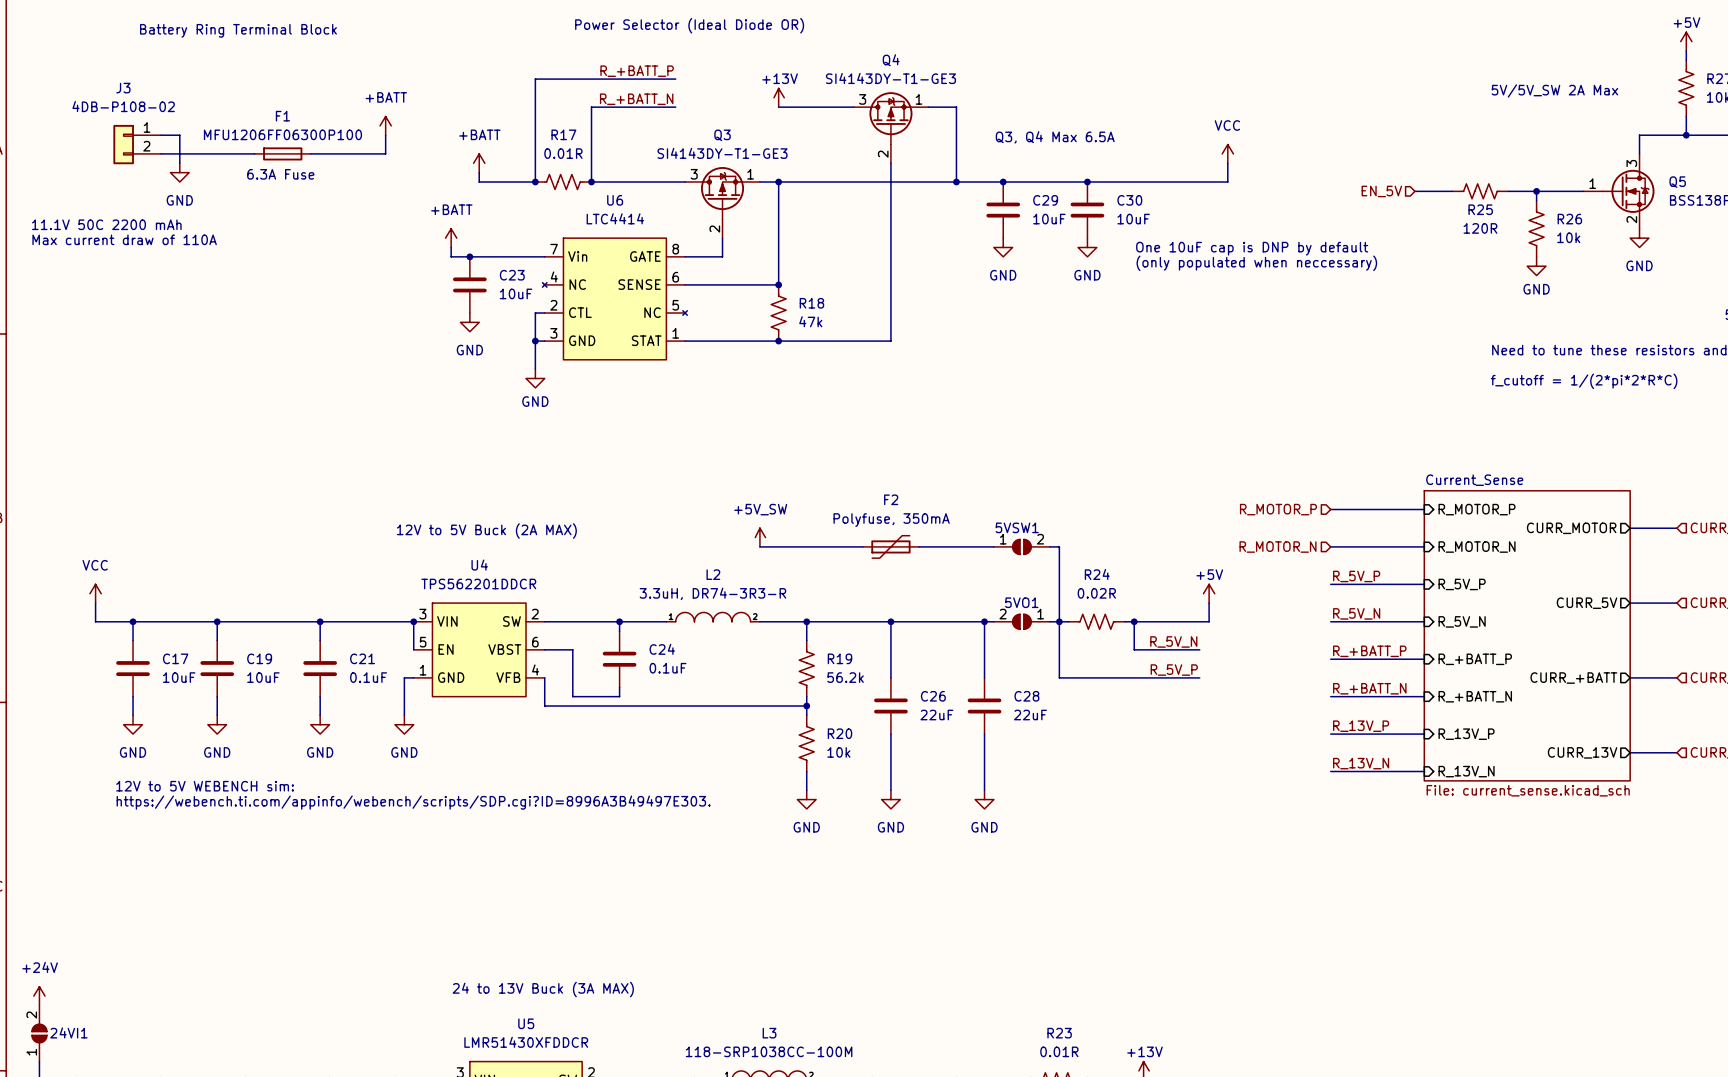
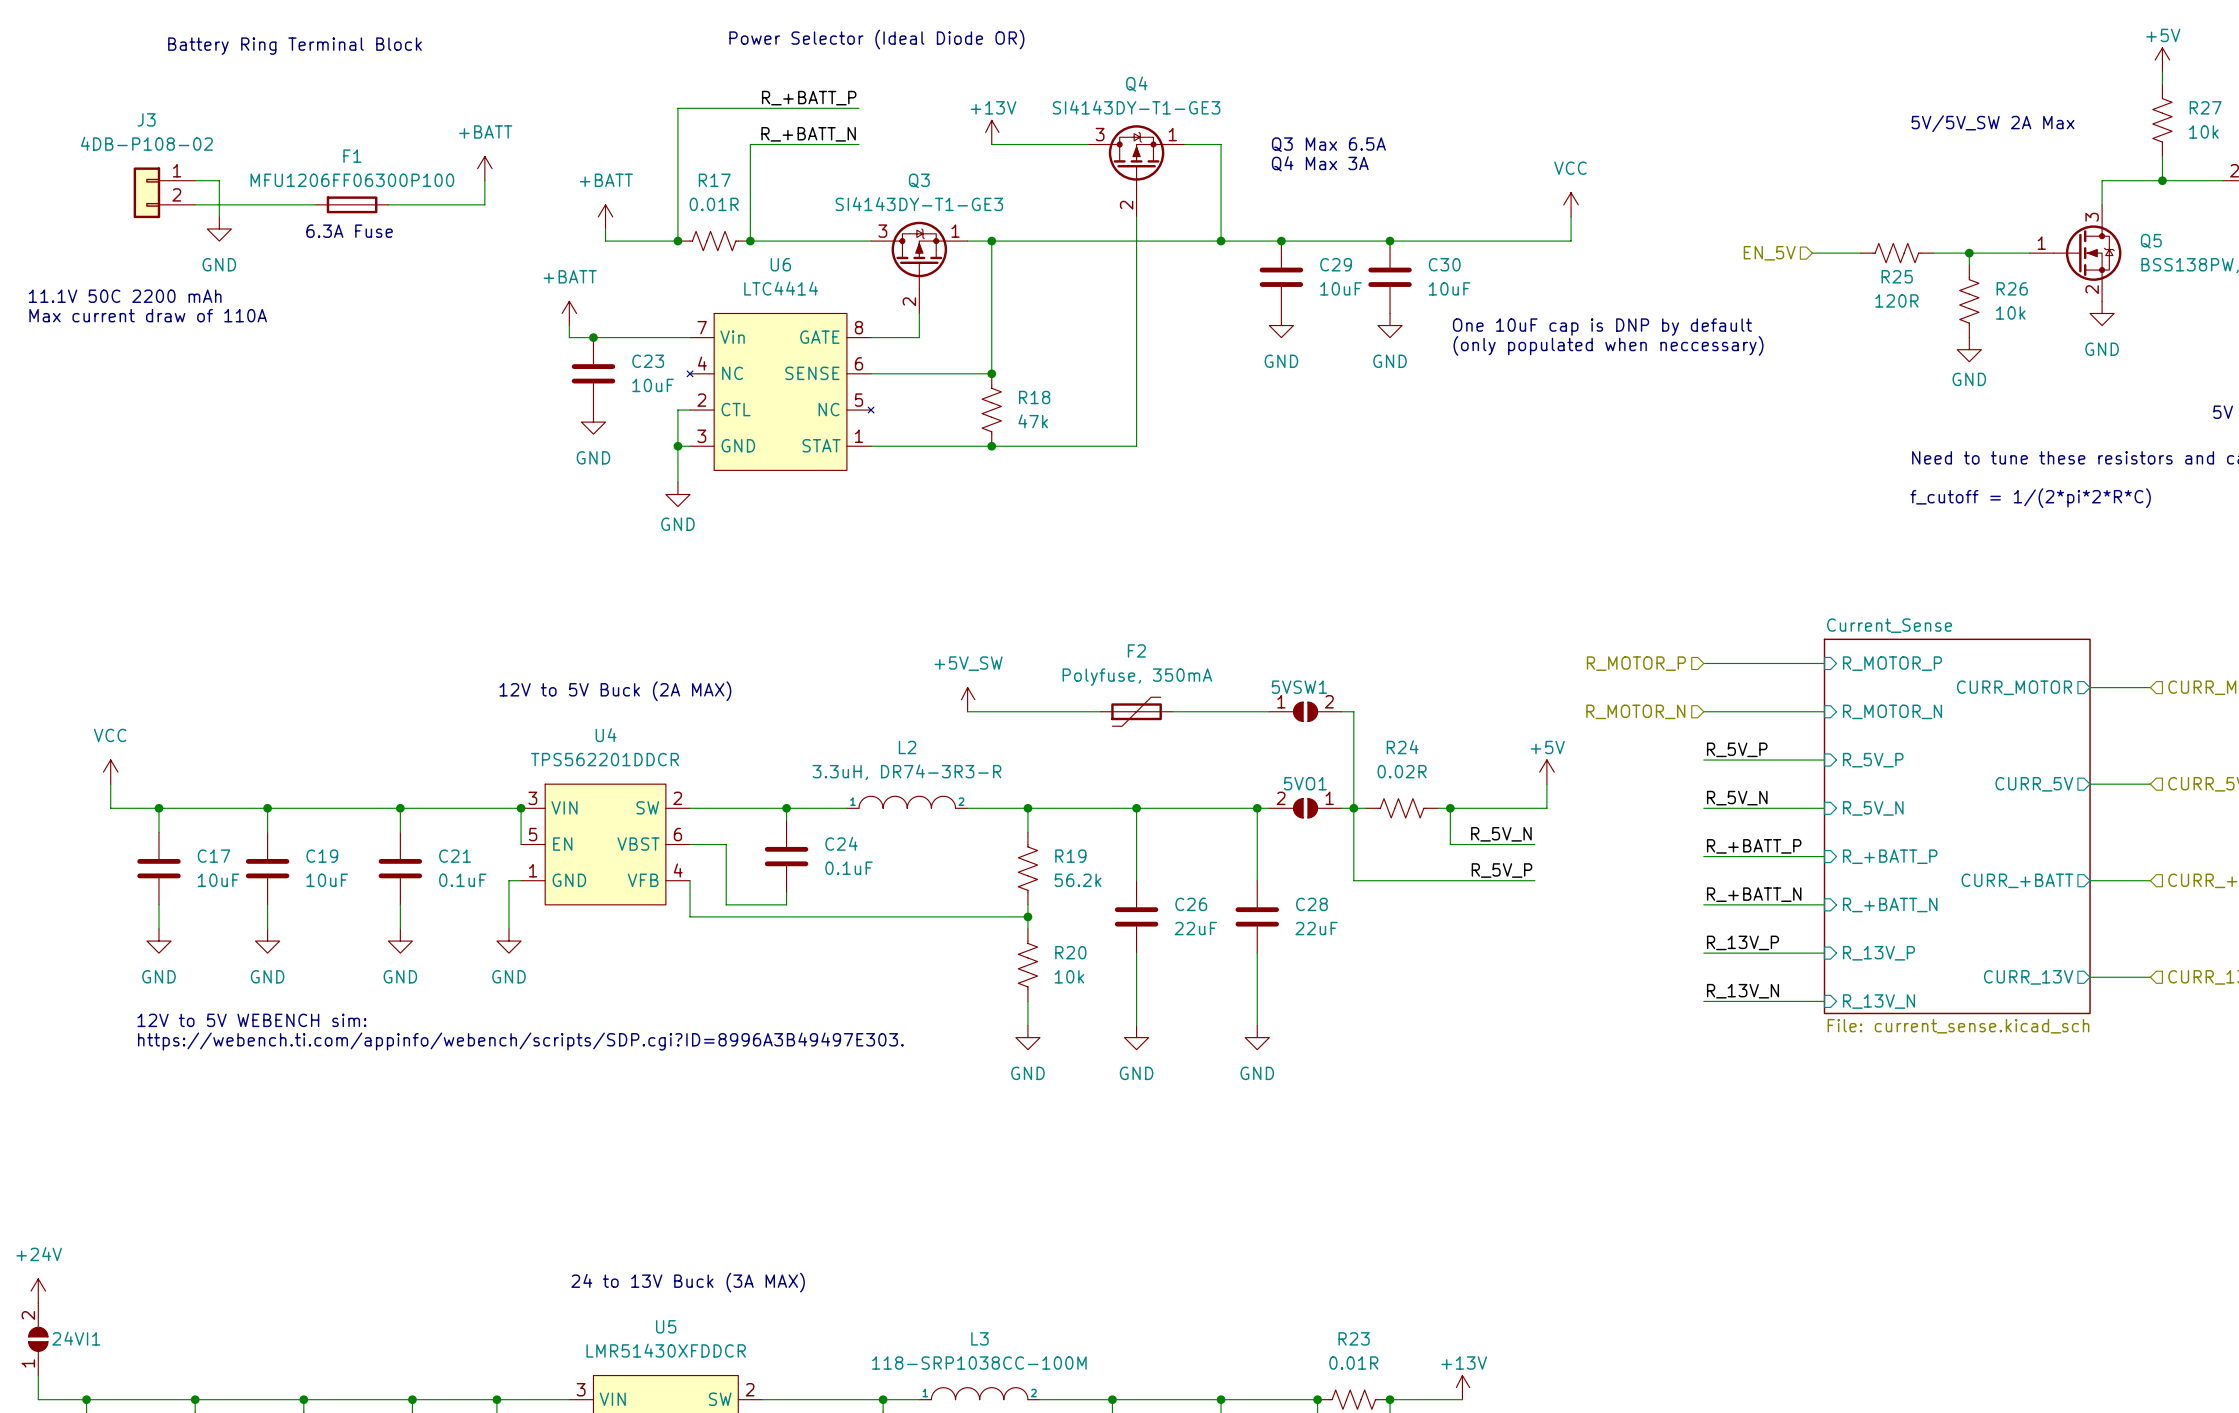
text: none -> Q3 Max 6.5A (1328, 144)
text: Q3, Q4 Max 6.5A (1055, 137) -> Q4 Max 3A (1320, 163)

